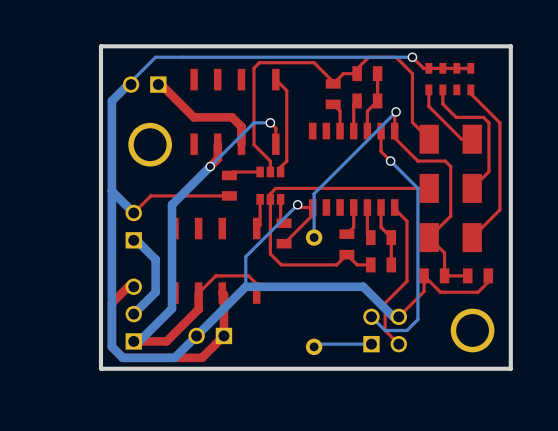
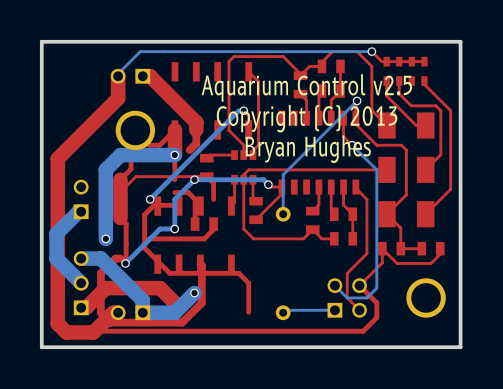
board edge: (100, 46) (100, 368) (510, 368) -> (91, 41) (41, 41) (41, 347) (460, 347) (460, 332)
top track: none -> (118, 76) (118, 98) (57, 158) (57, 323) (66, 332) (93, 332) (113, 312) (118, 312)
bottom track: (131, 84) (128, 84) (111, 100) (111, 346) (122, 357) (174, 357) (245, 286) -> none
top track: (161, 84) (193, 117) (232, 117) (241, 126) (241, 144) -> (145, 76) (150, 76) (196, 122) (196, 129)
text: none -> Aquarium Control v2.5 (306, 87)
bottom track: (264, 122) (253, 122) (172, 204) (172, 308) (139, 341) (133, 341) -> (238, 110) (150, 199)
text: none -> Copyright (C) 2013 (307, 118)
top track: none -> (131, 145) (131, 169) (120, 179) (120, 218) (126, 223) (125, 263)
top track: none -> (149, 145) (159, 145) (174, 129) (174, 179)
via: (210, 166) -> none
text: none -> Bryan Hughes (308, 149)
bottom track: none -> (174, 155) (120, 155) (105, 169) (105, 238)
via: none -> (174, 155)
bottom track: (111, 191) (133, 213) -> none
top track: none -> (206, 176) (213, 183) (213, 199)
via: none -> (194, 179)
bottom track: (297, 204) (245, 256) (245, 286) -> (268, 184) (263, 179) (194, 179) (174, 199) (174, 228) (160, 228) (125, 263)
top track: none -> (174, 192) (188, 192) (195, 199) (195, 224)
via: none -> (150, 199)
part position: (133, 226) -> (81, 199)
top track: none -> (174, 205) (154, 205) (144, 214) (144, 248) (169, 273) (238, 273) (248, 283) (248, 312)
bottom track: none -> (81, 211) (78, 211) (56, 233) (56, 258) (81, 283)
bottom track: (133, 240) (136, 240) (155, 259) (155, 292) (133, 314) -> none
part: none -> (204, 224)
top track: none -> (213, 224) (213, 229) (204, 238) (149, 238) (144, 243)
via: none -> (174, 228)
via: none -> (105, 238)
bottom track: none -> (81, 258) (100, 258) (142, 300) (142, 312) (174, 312) (194, 293)
bottom track: (245, 286) (363, 286) (393, 316) (398, 316) -> none
via: none -> (125, 263)
top track: (256, 293) (256, 284) (248, 275) (215, 275) (198, 293) (198, 309) (166, 341) (133, 341) -> none
part position: (133, 314) -> (81, 283)
top track: none -> (359, 285) (376, 302) (376, 317) (363, 331) (94, 331)
via: none -> (194, 293)
part: (210, 335) -> none
top track: none -> (81, 307) (86, 307) (105, 288) (160, 288) (174, 303) (174, 312)
part: none -> (130, 312)

